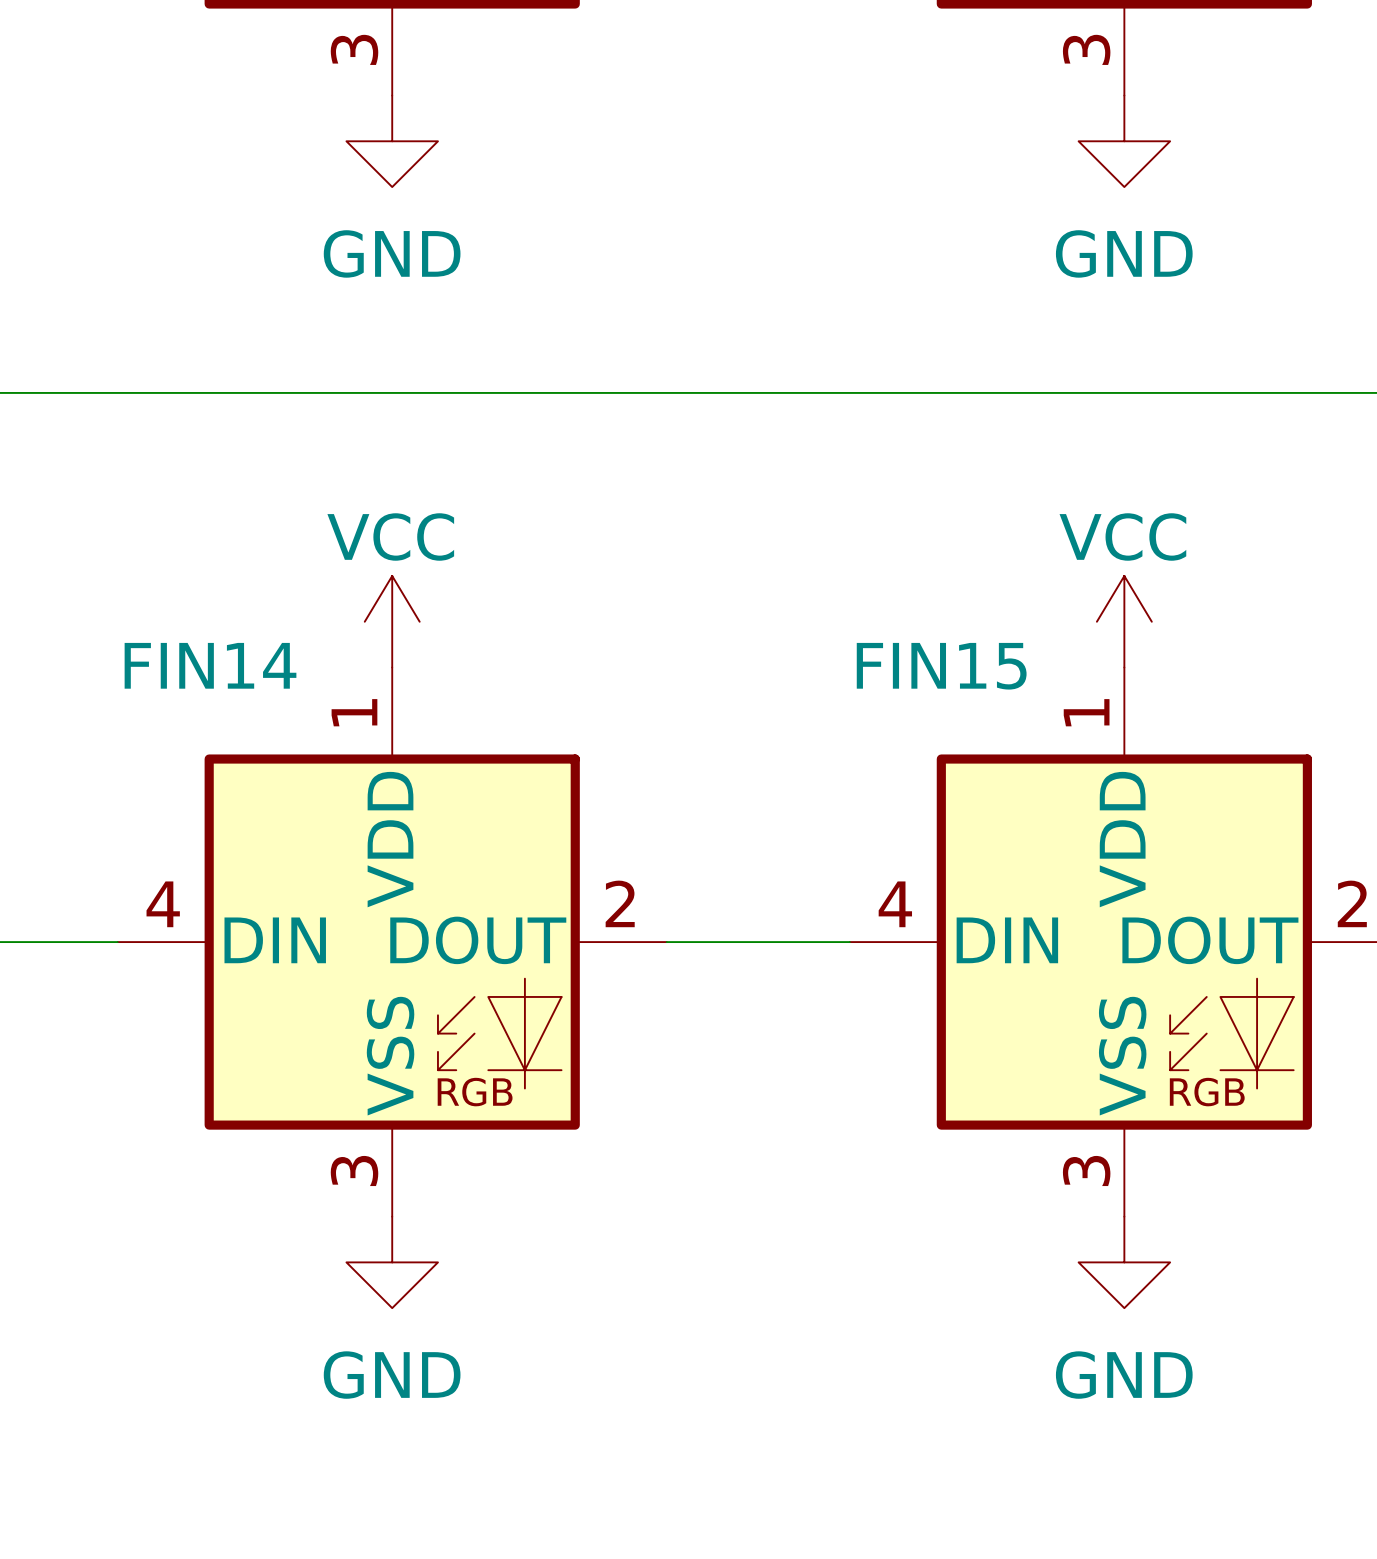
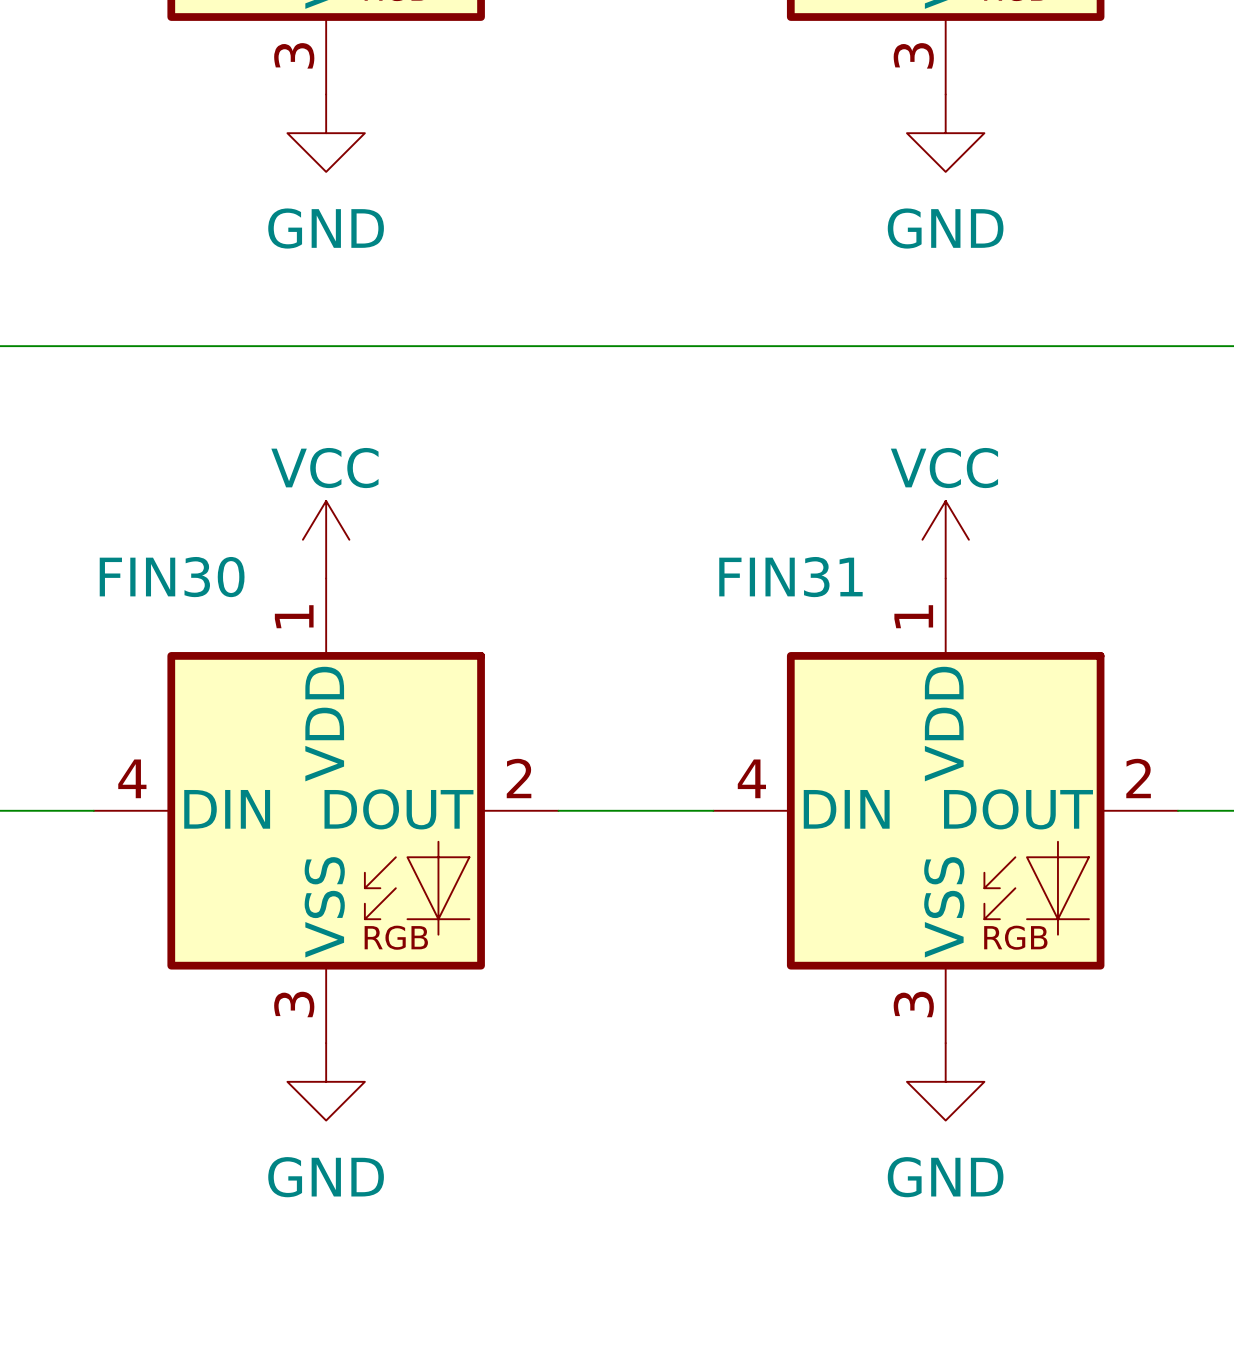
FIN14 name: FIN14 (210, 665) -> FIN30 (172, 577)
FIN15 name: FIN15 (941, 666) -> FIN31 (790, 577)

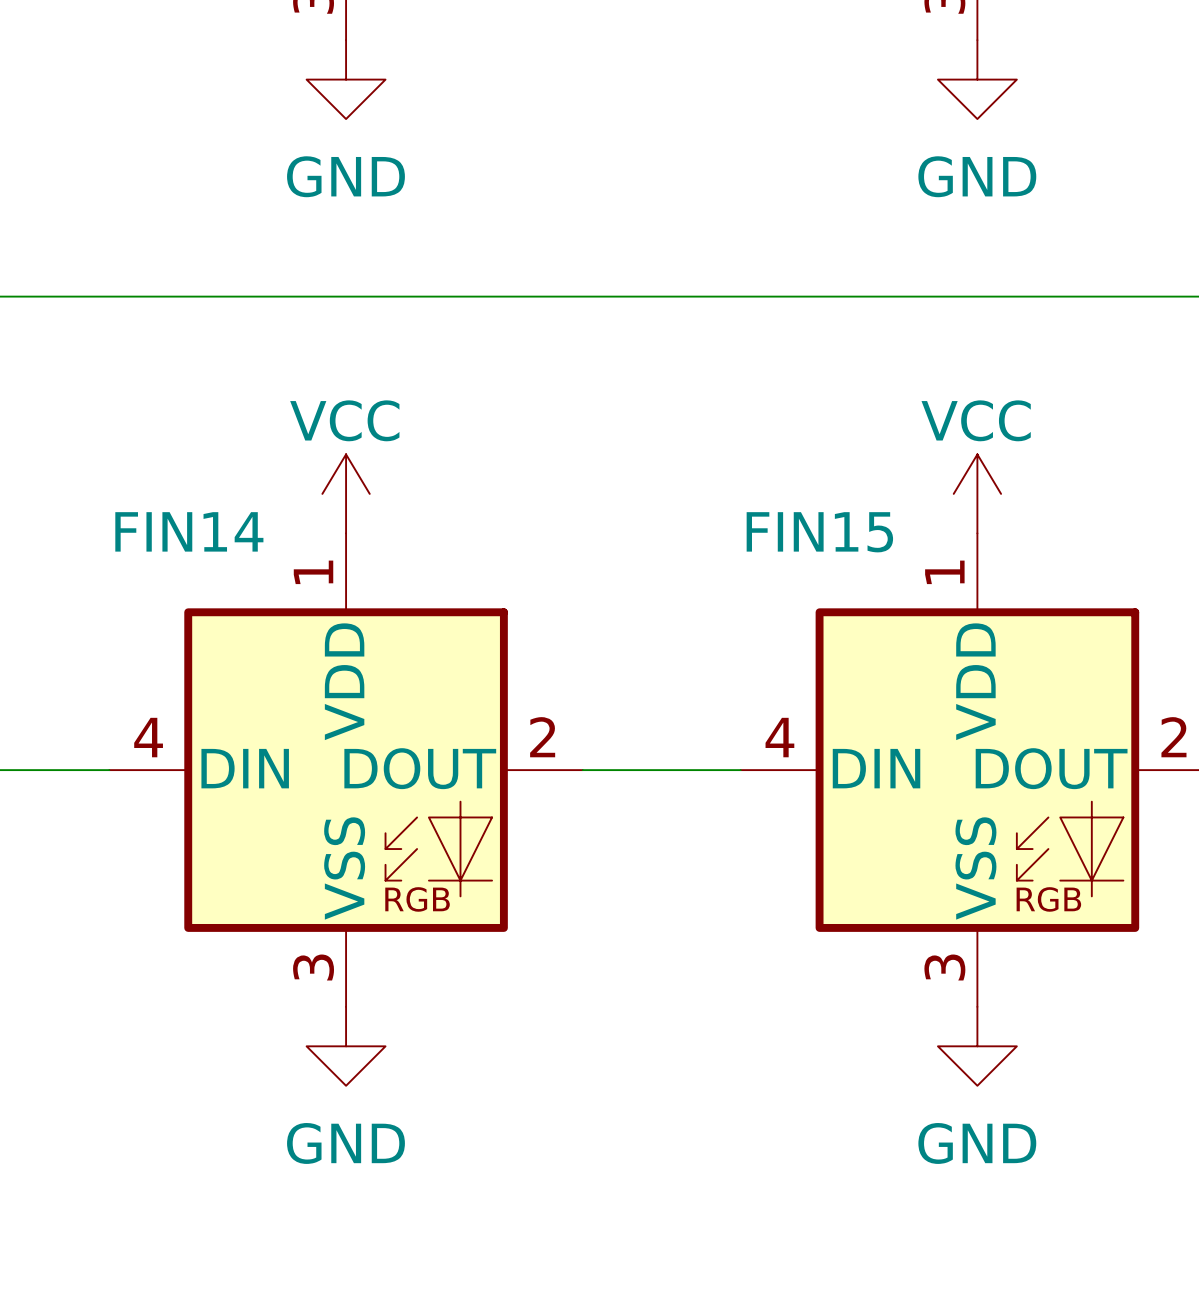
FIN30 name: FIN30 (172, 577) -> FIN14 (189, 531)
FIN31 name: FIN31 (790, 577) -> FIN15 (819, 532)

